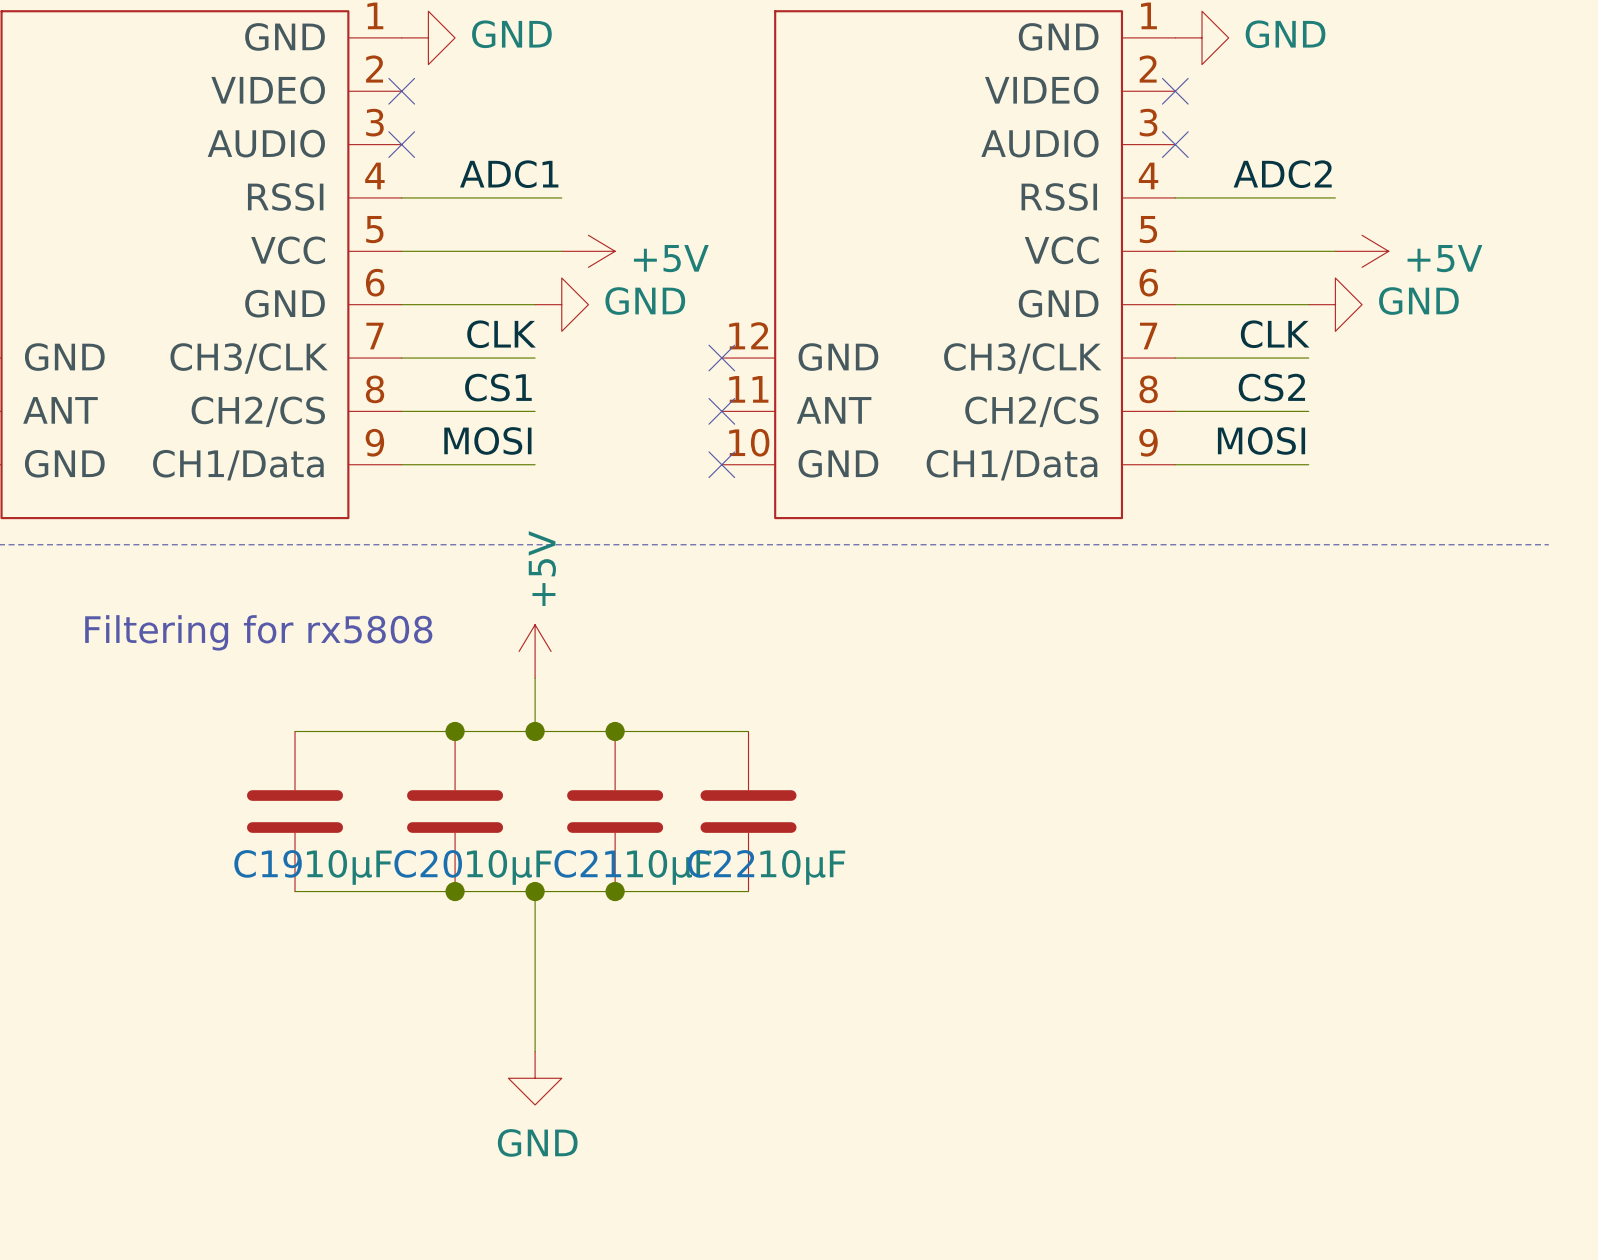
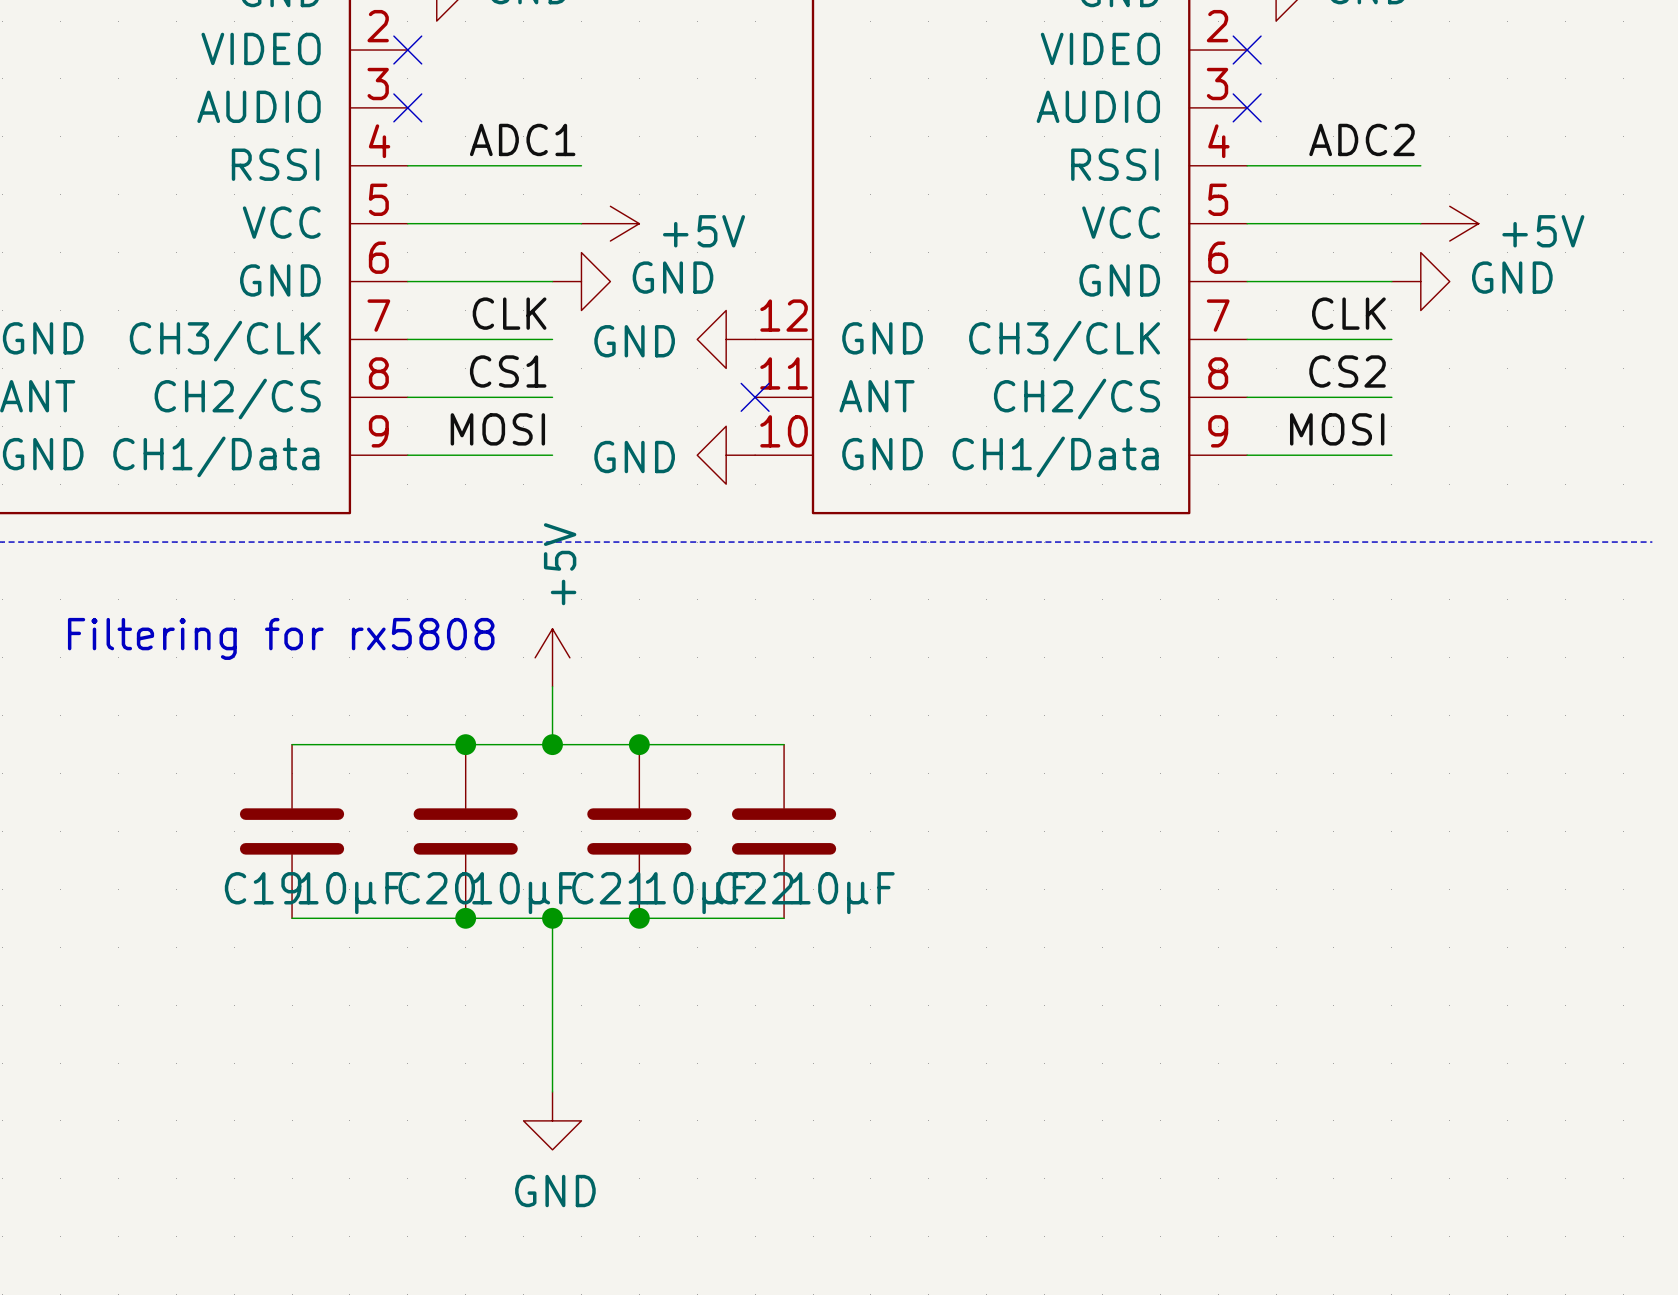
power symbol: none -> GND (726, 339)
no-connect mark: (721, 358) -> none
power symbol: none -> GND (726, 455)
no-connect mark: (721, 464) -> none

